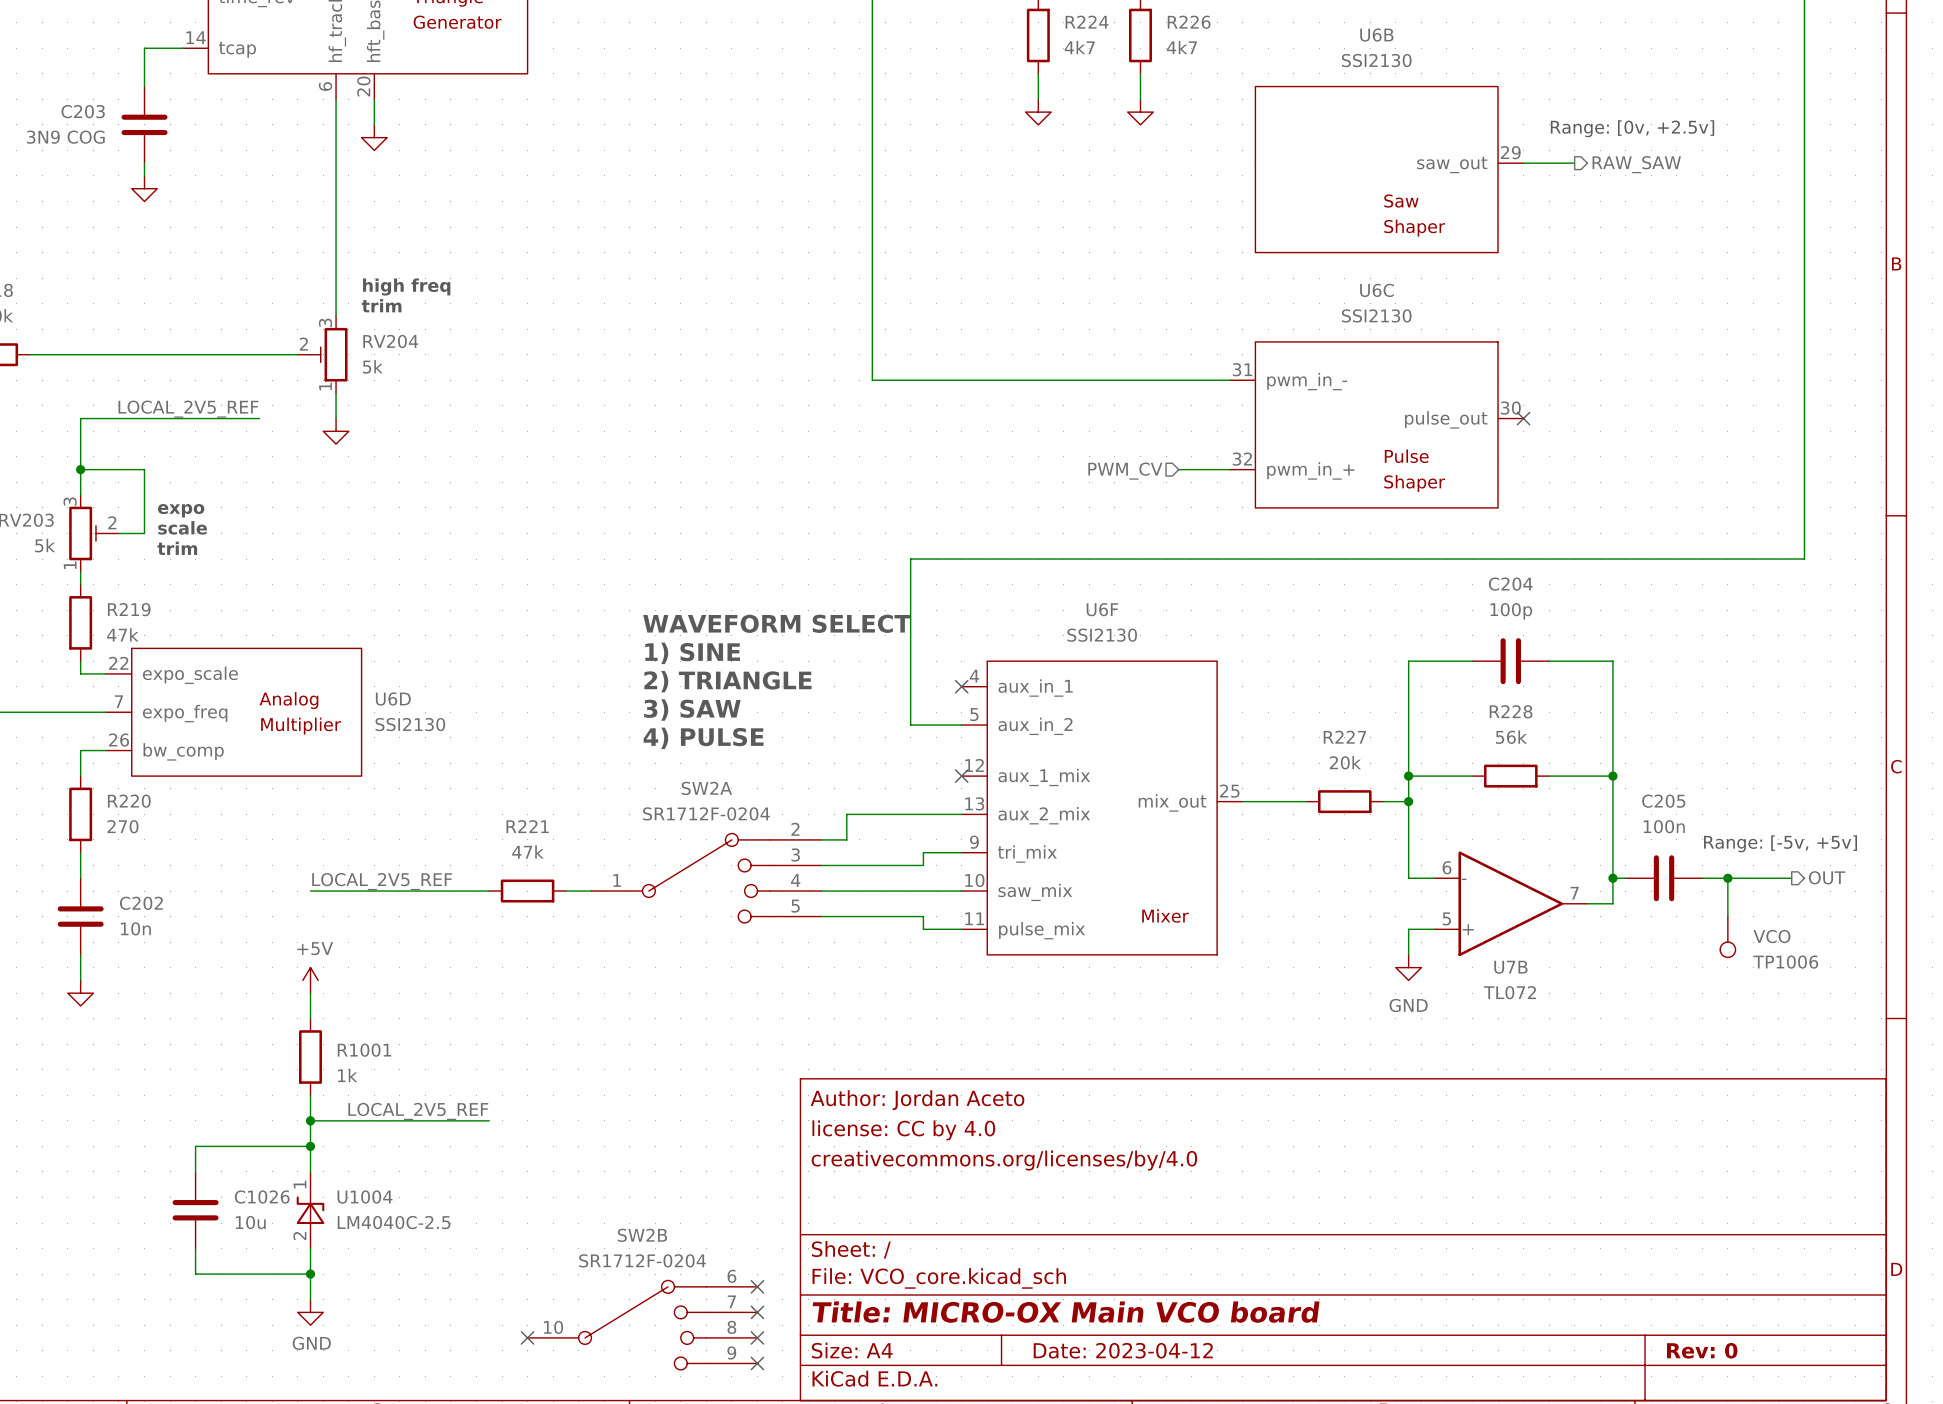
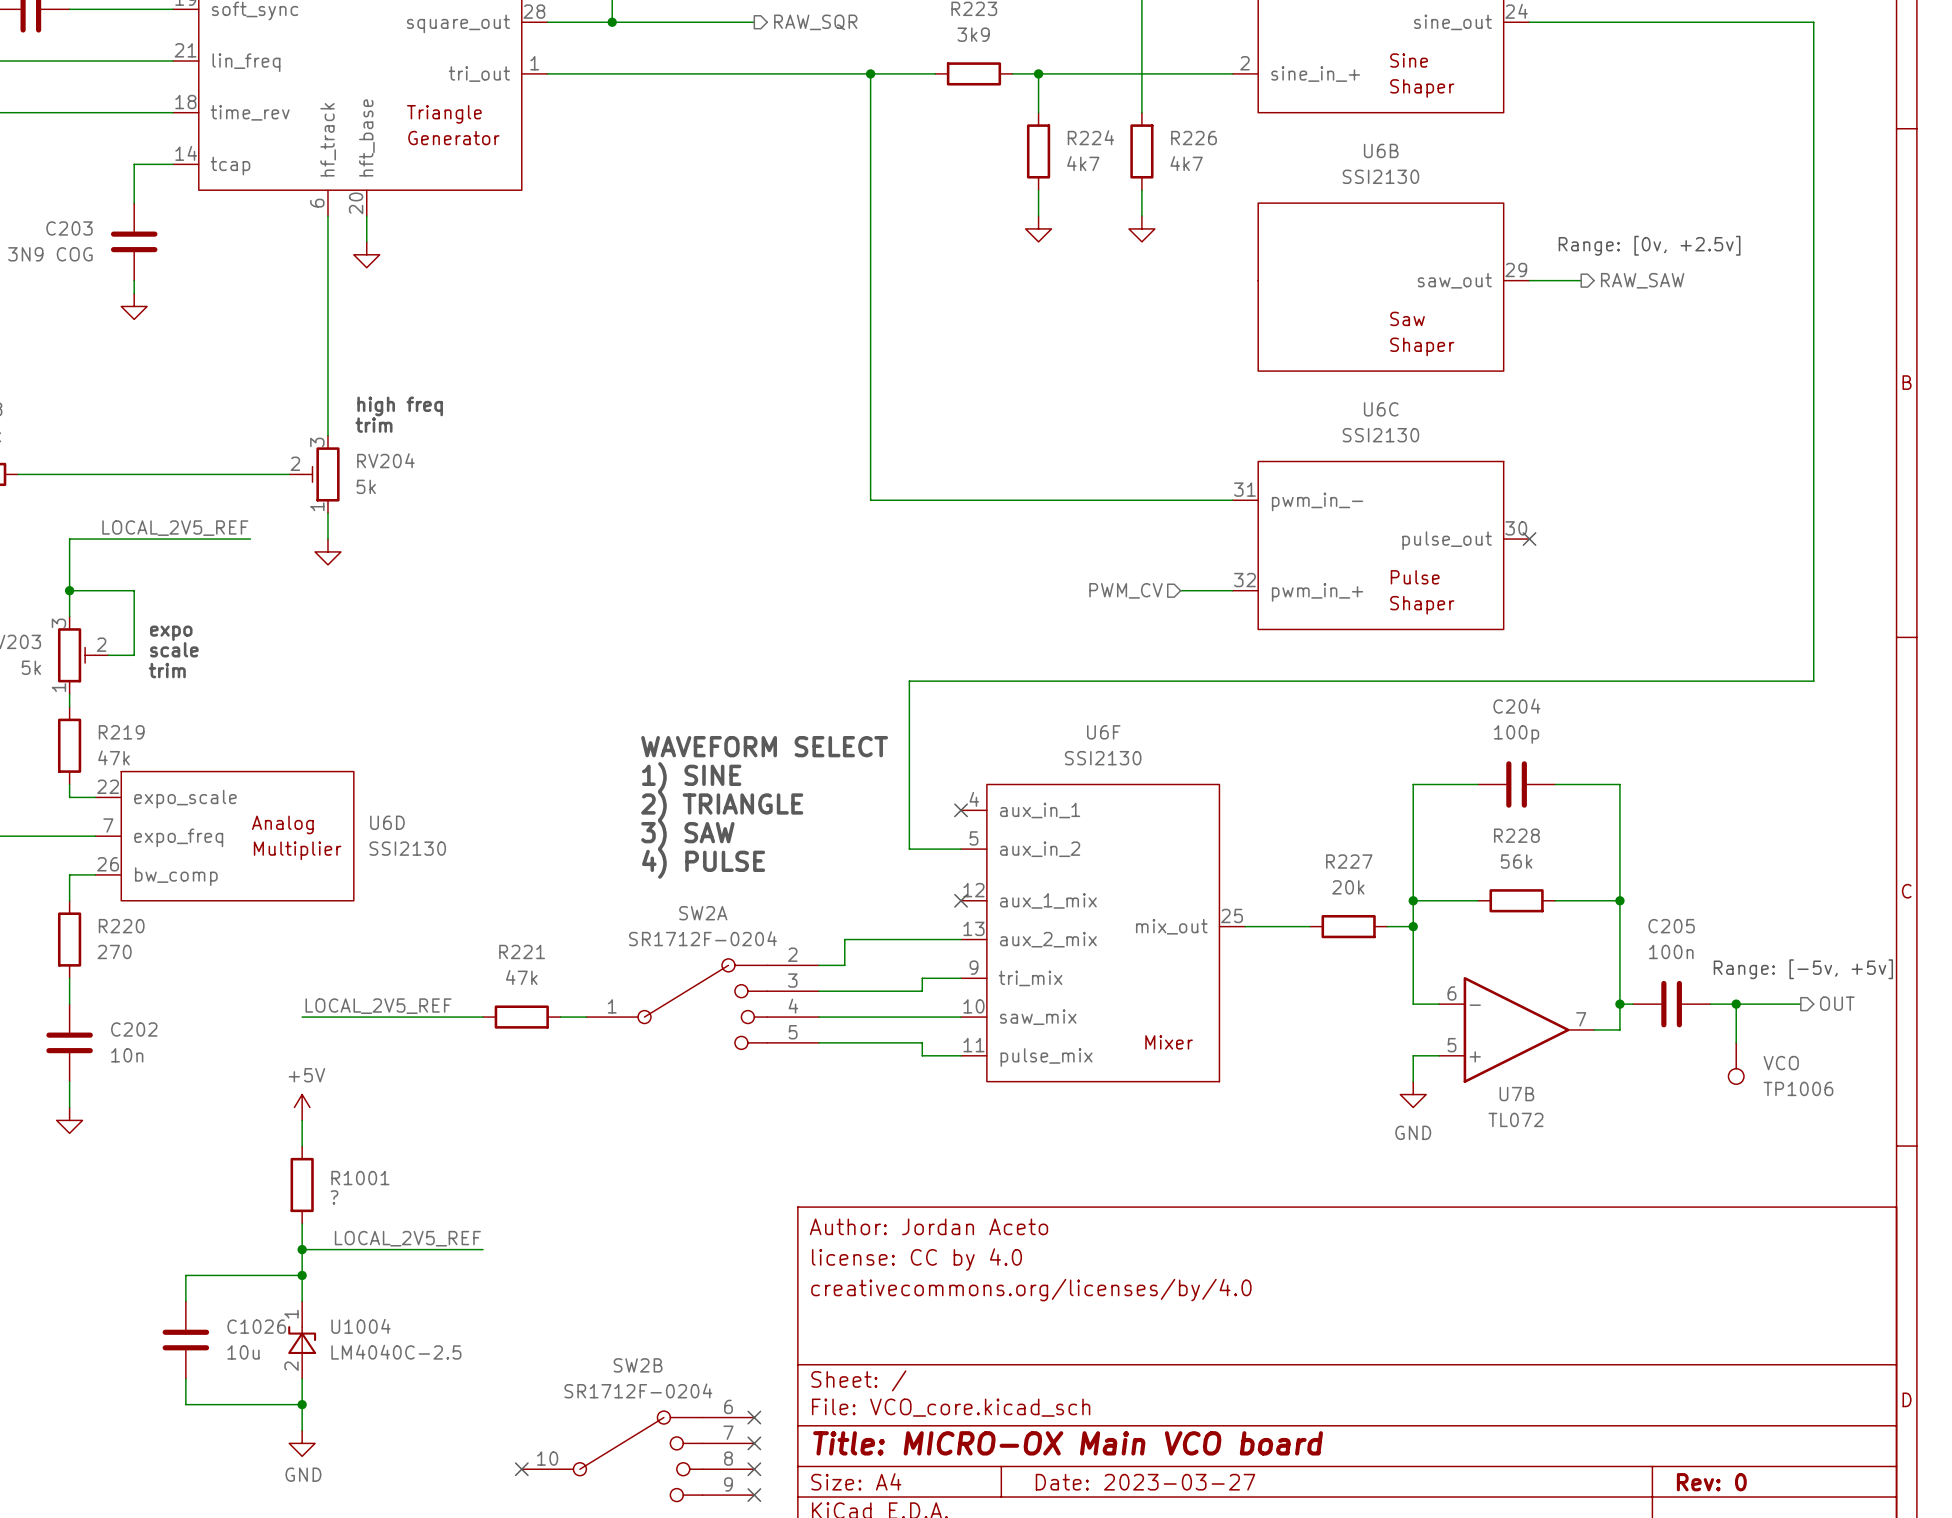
R1001 value: 1k (347, 1075) -> ? (334, 1197)
title block: Date: 2023-04-12 (1123, 1350) -> Date: 2023-03-27 (1145, 1482)

